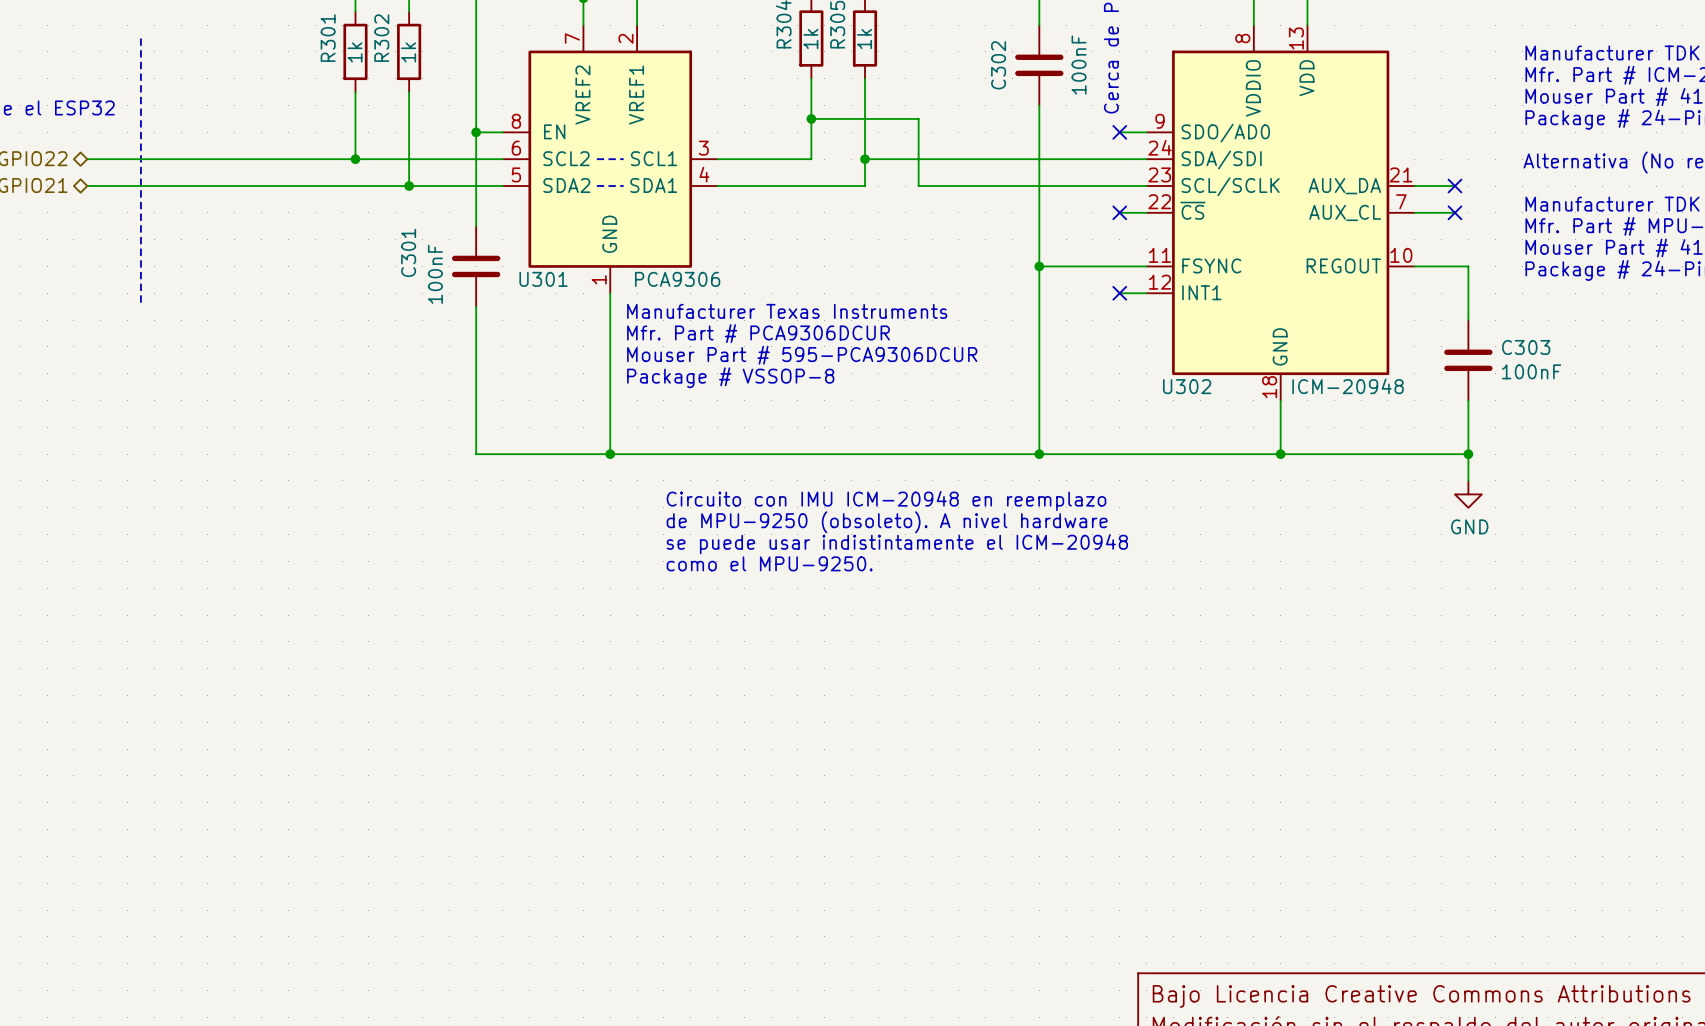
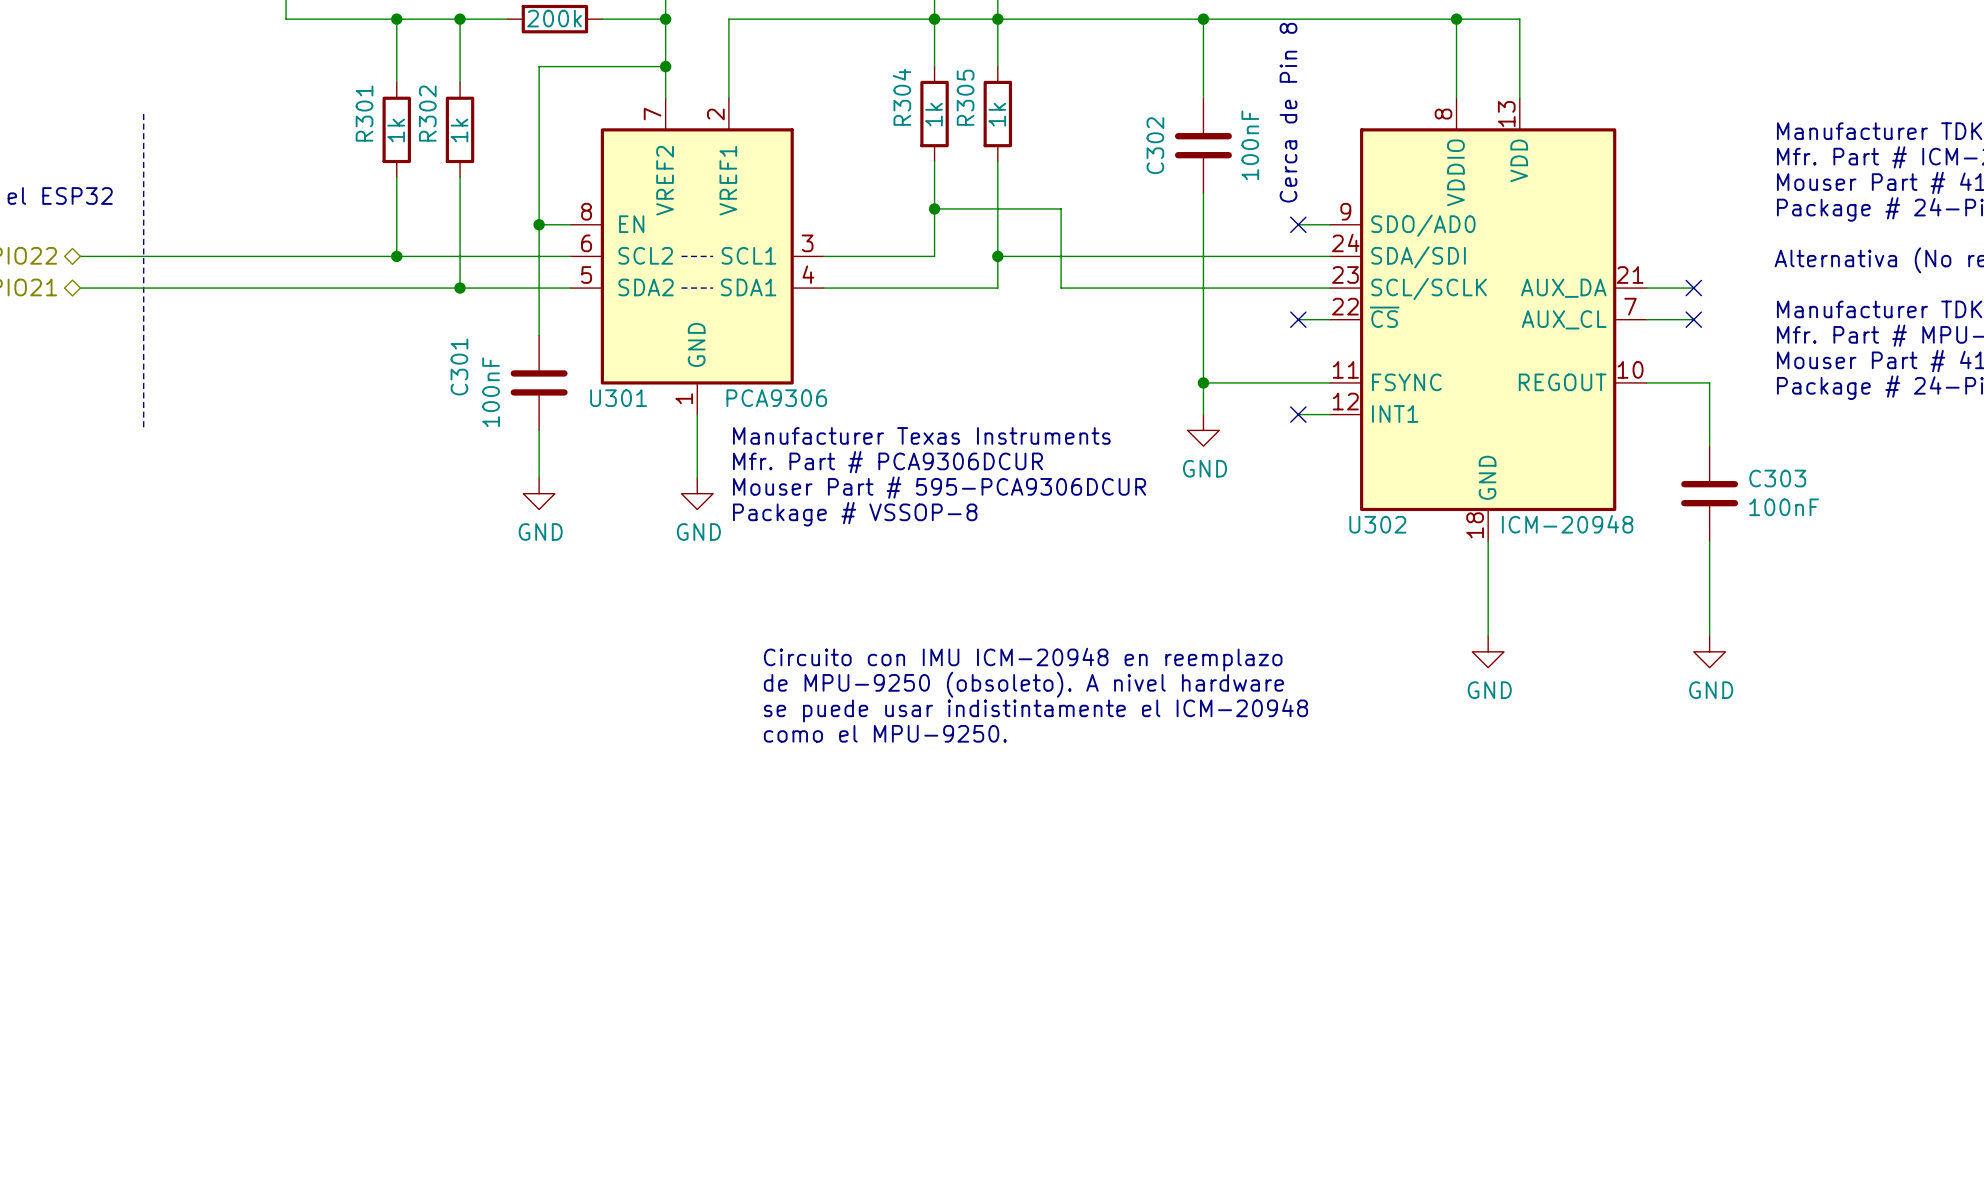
wire: (1039, 293) (1039, 454) -> none
power symbol: none -> GND (1203, 430)
text position: Manufacturer Texas Instruments (787, 311) -> Manufacturer Texas Instruments (921, 435)
text position: Mfr. Part # PCA9306DCUR (758, 333) -> Mfr. Part # PCA9306DCUR (887, 462)
wire: (476, 346) (476, 454) (1468, 454) -> none
wire: (610, 346) (610, 454) -> none
text position: Mouser Part # 595-PCA9306DCUR (802, 355) -> Mouser Part # 595-PCA9306DCUR (939, 487)
power symbol: none -> GND (539, 493)
power symbol: none -> GND (697, 493)
text position: Package # VSSOP-8 (730, 377) -> Package # VSSOP-8 (855, 514)
junction: (610, 454) -> none
junction: (1039, 454) -> none
wire: none -> (1488, 604) (1488, 636)
junction: (1280, 454) -> none
junction: (1468, 454) -> none
power symbol: none -> GND (1488, 651)

